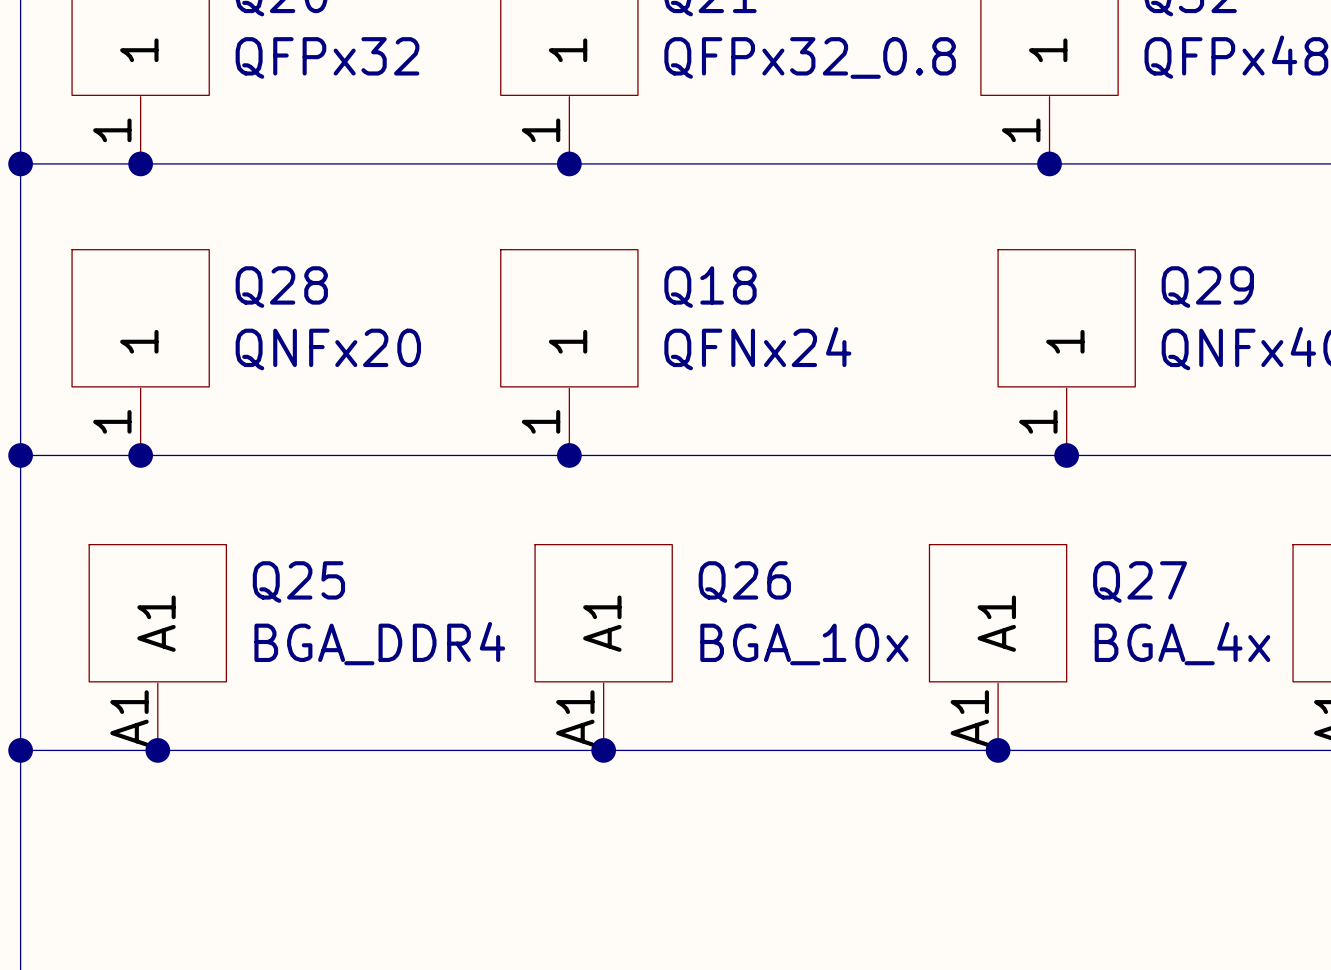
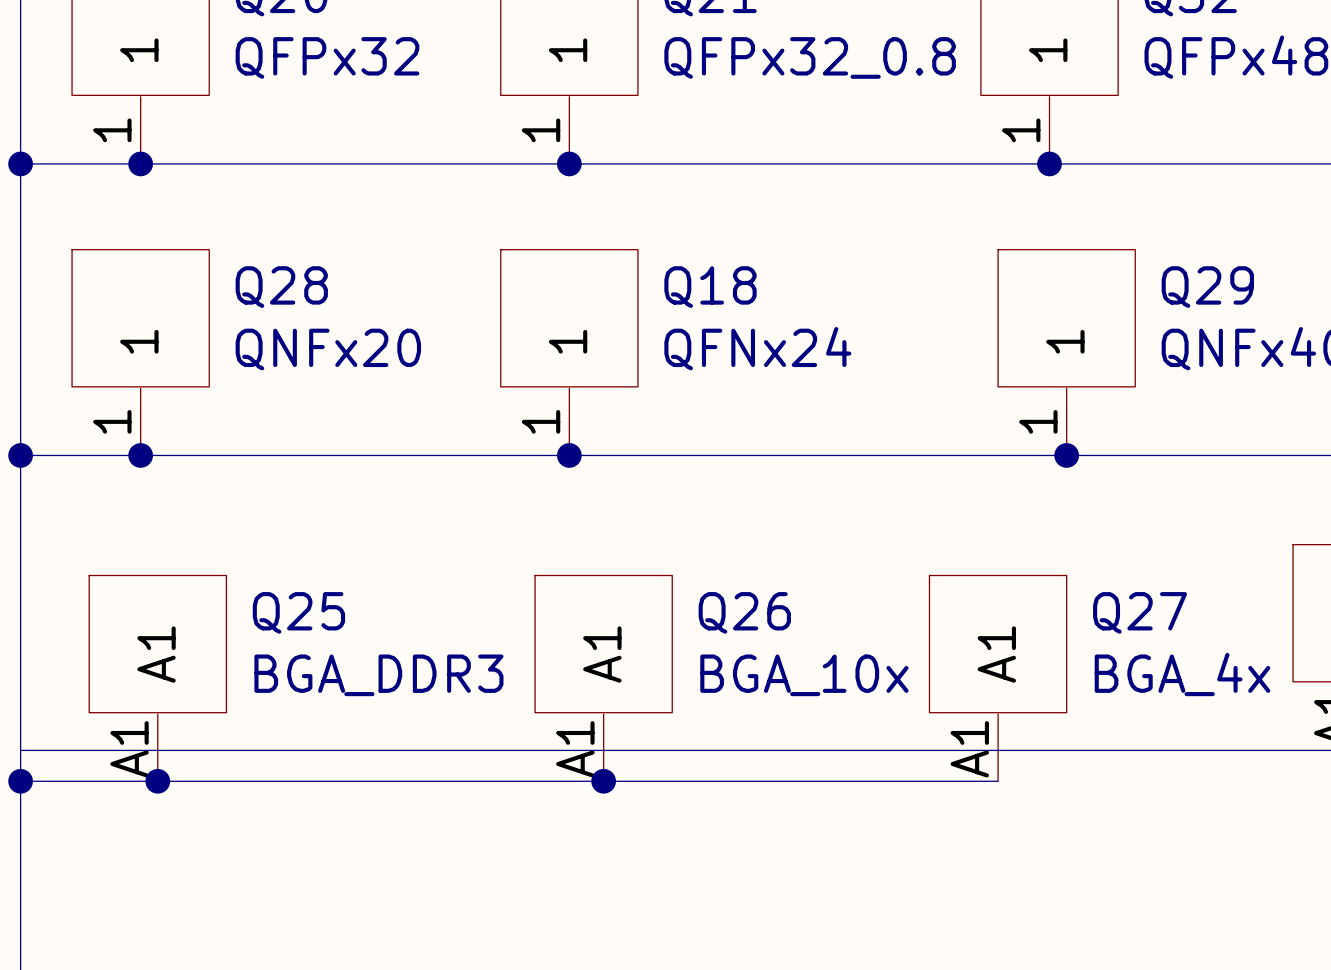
Q25 value: BGA_DDR4 (379, 643) -> BGA_DDR3 (378, 675)
Q25 position: (157, 647) -> (157, 678)
Q26 position: (603, 647) -> (603, 678)
Q27 position: (998, 647) -> (998, 678)
junction position: (20, 750) -> (20, 781)
junction position: (157, 750) -> (157, 781)
junction position: (603, 750) -> (603, 781)
junction: (998, 750) -> none
wire: none -> (20, 781) (998, 781)

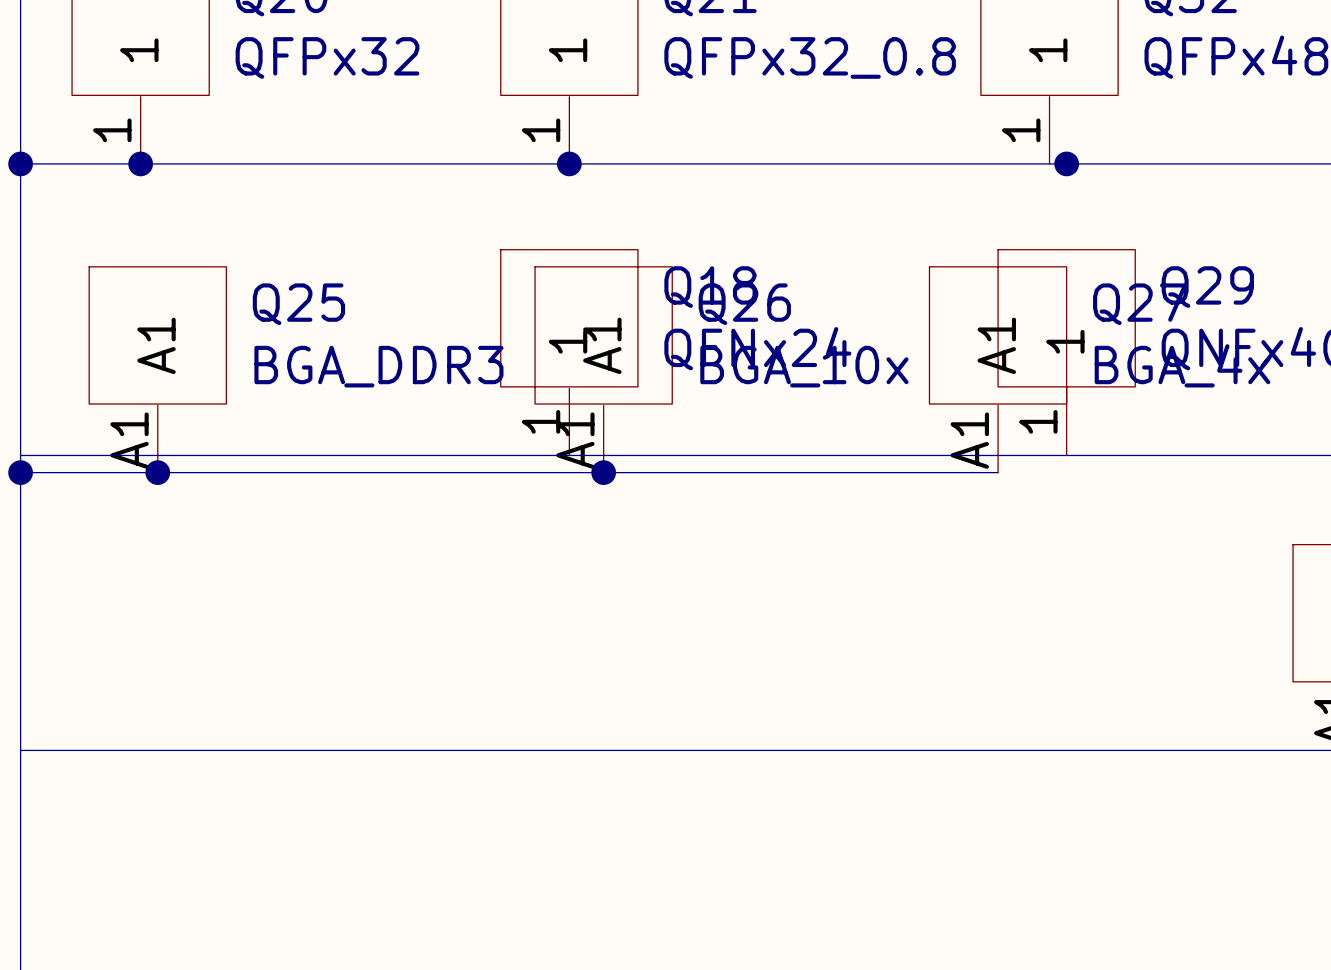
junction position: (1049, 163) -> (1066, 163)
Q28: QNFx20 (140, 352) -> none
junction position: (20, 455) -> (20, 472)
junction position: (140, 455) -> (157, 472)
junction position: (569, 455) -> (603, 472)
junction: (1066, 455) -> none
Q25 position: (157, 678) -> (157, 369)
Q26 position: (603, 678) -> (603, 369)
Q27 position: (998, 678) -> (998, 369)
wire: (20, 781) (998, 781) -> (20, 472) (998, 472)
junction: (20, 781) -> none
junction: (157, 781) -> none
junction: (603, 781) -> none

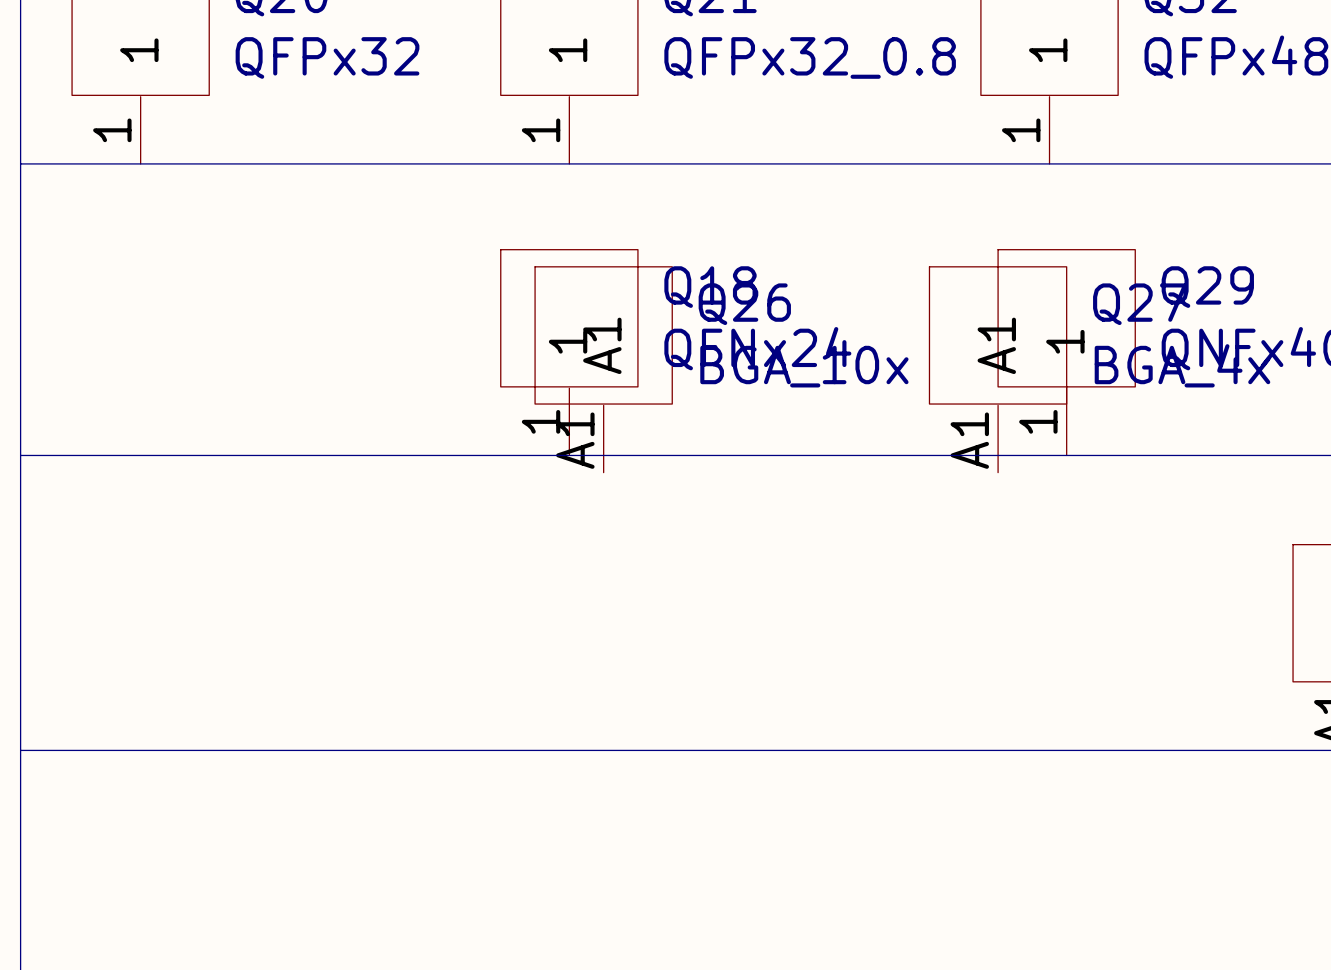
junction: (20, 163) -> none
junction: (140, 163) -> none
junction: (569, 163) -> none
junction: (1066, 163) -> none
Q25: BGA_DDR3 (157, 369) -> none
wire: (20, 472) (998, 472) -> none
junction: (20, 472) -> none
junction: (157, 472) -> none
junction: (603, 472) -> none

